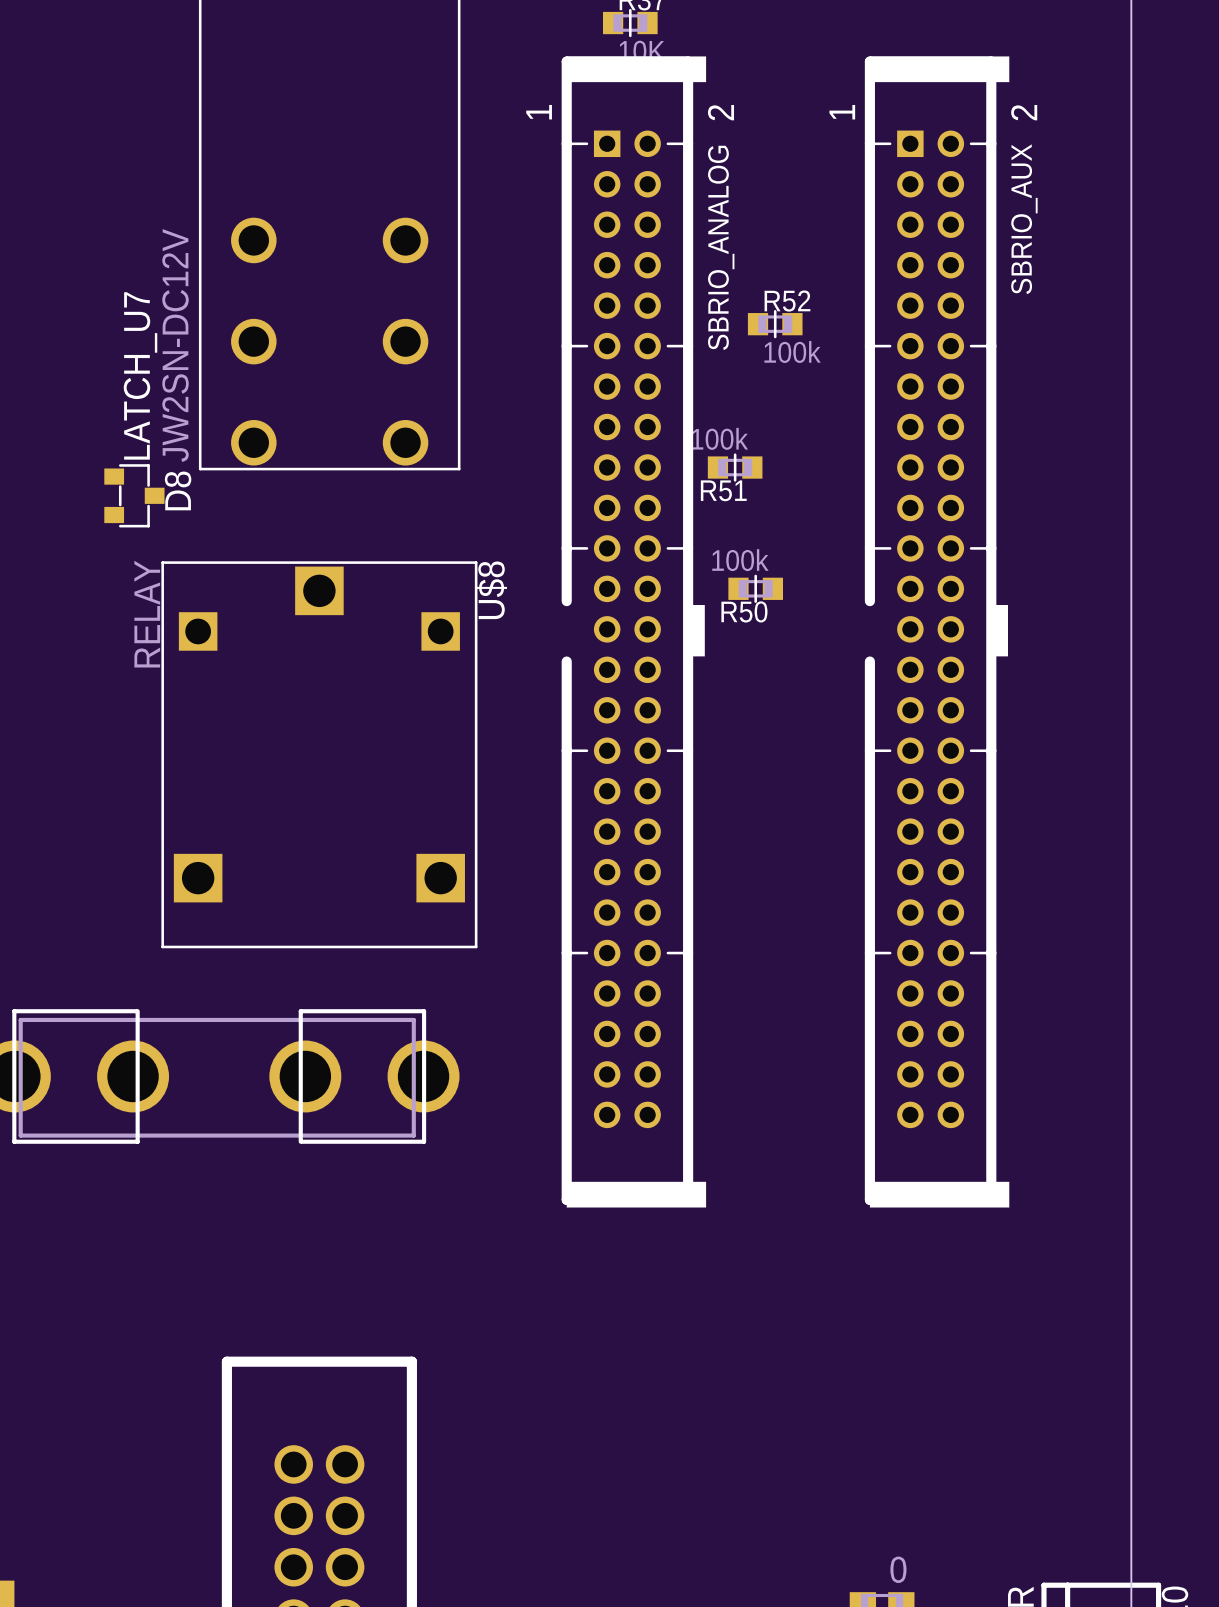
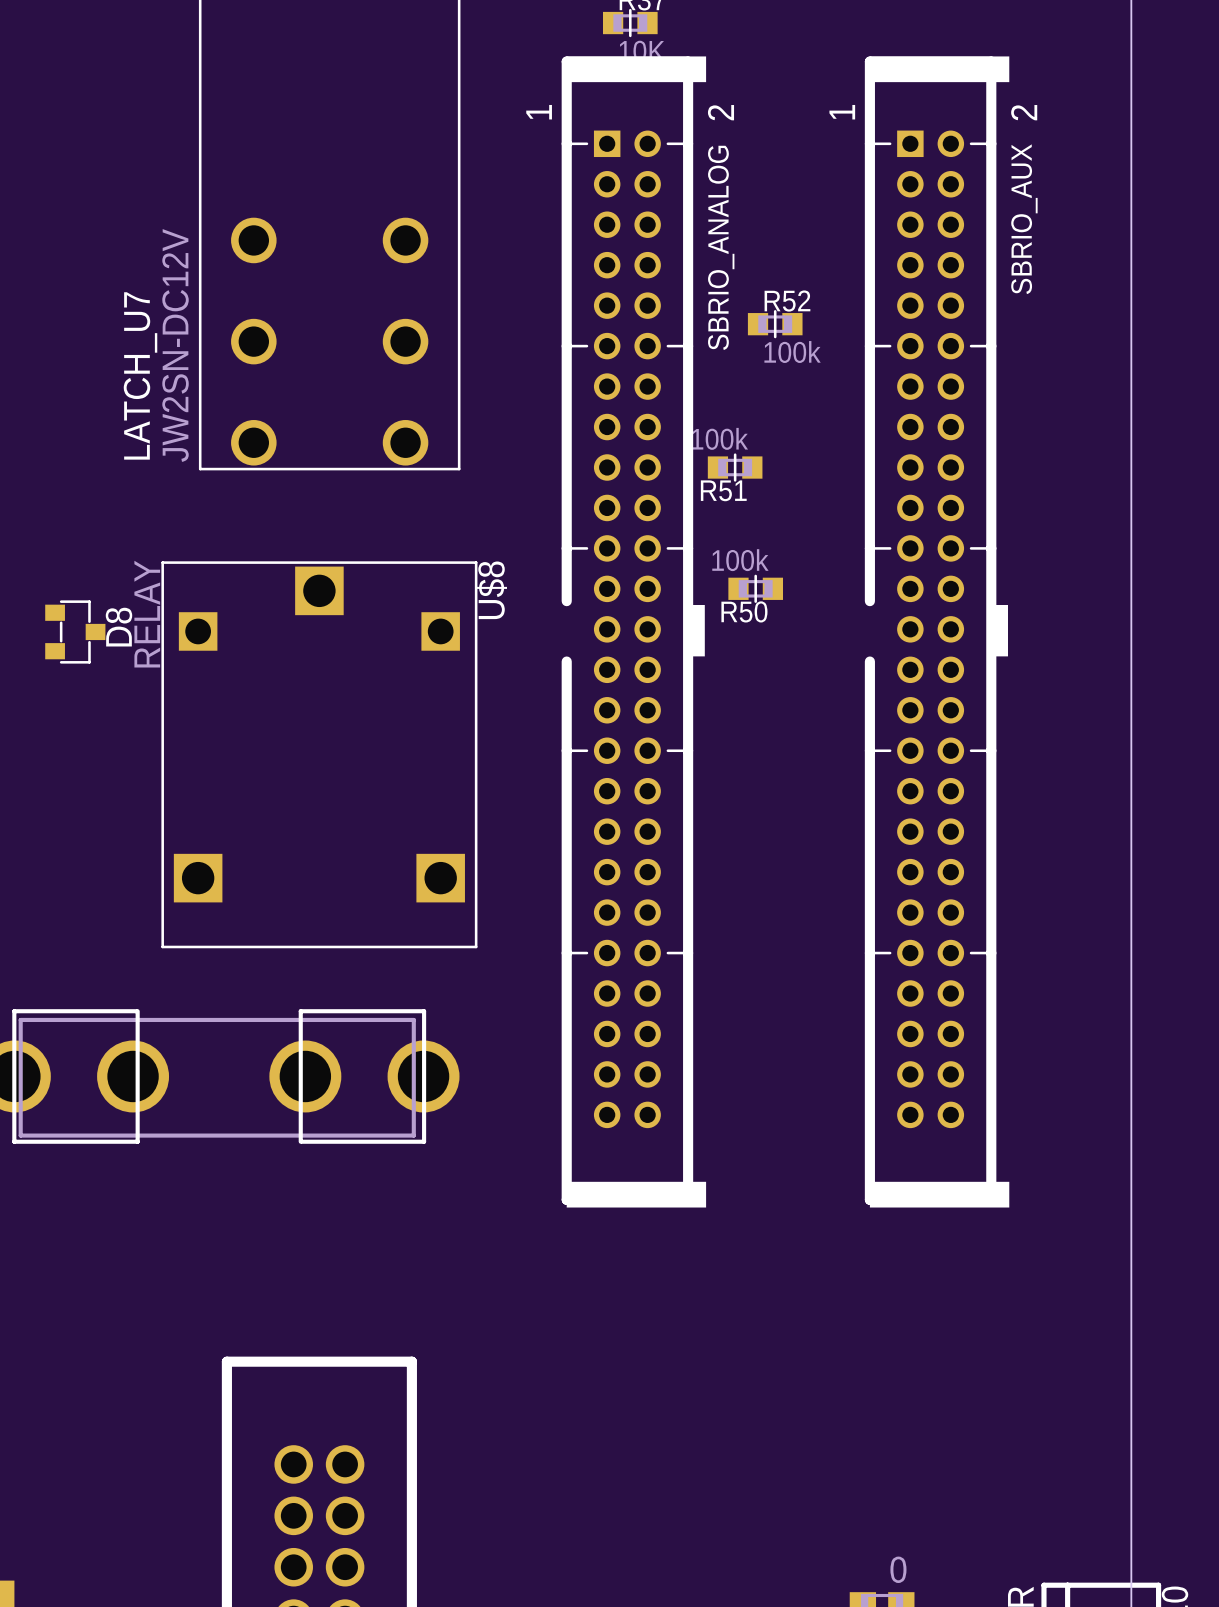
D8 position: (134, 495) -> (75, 631)

